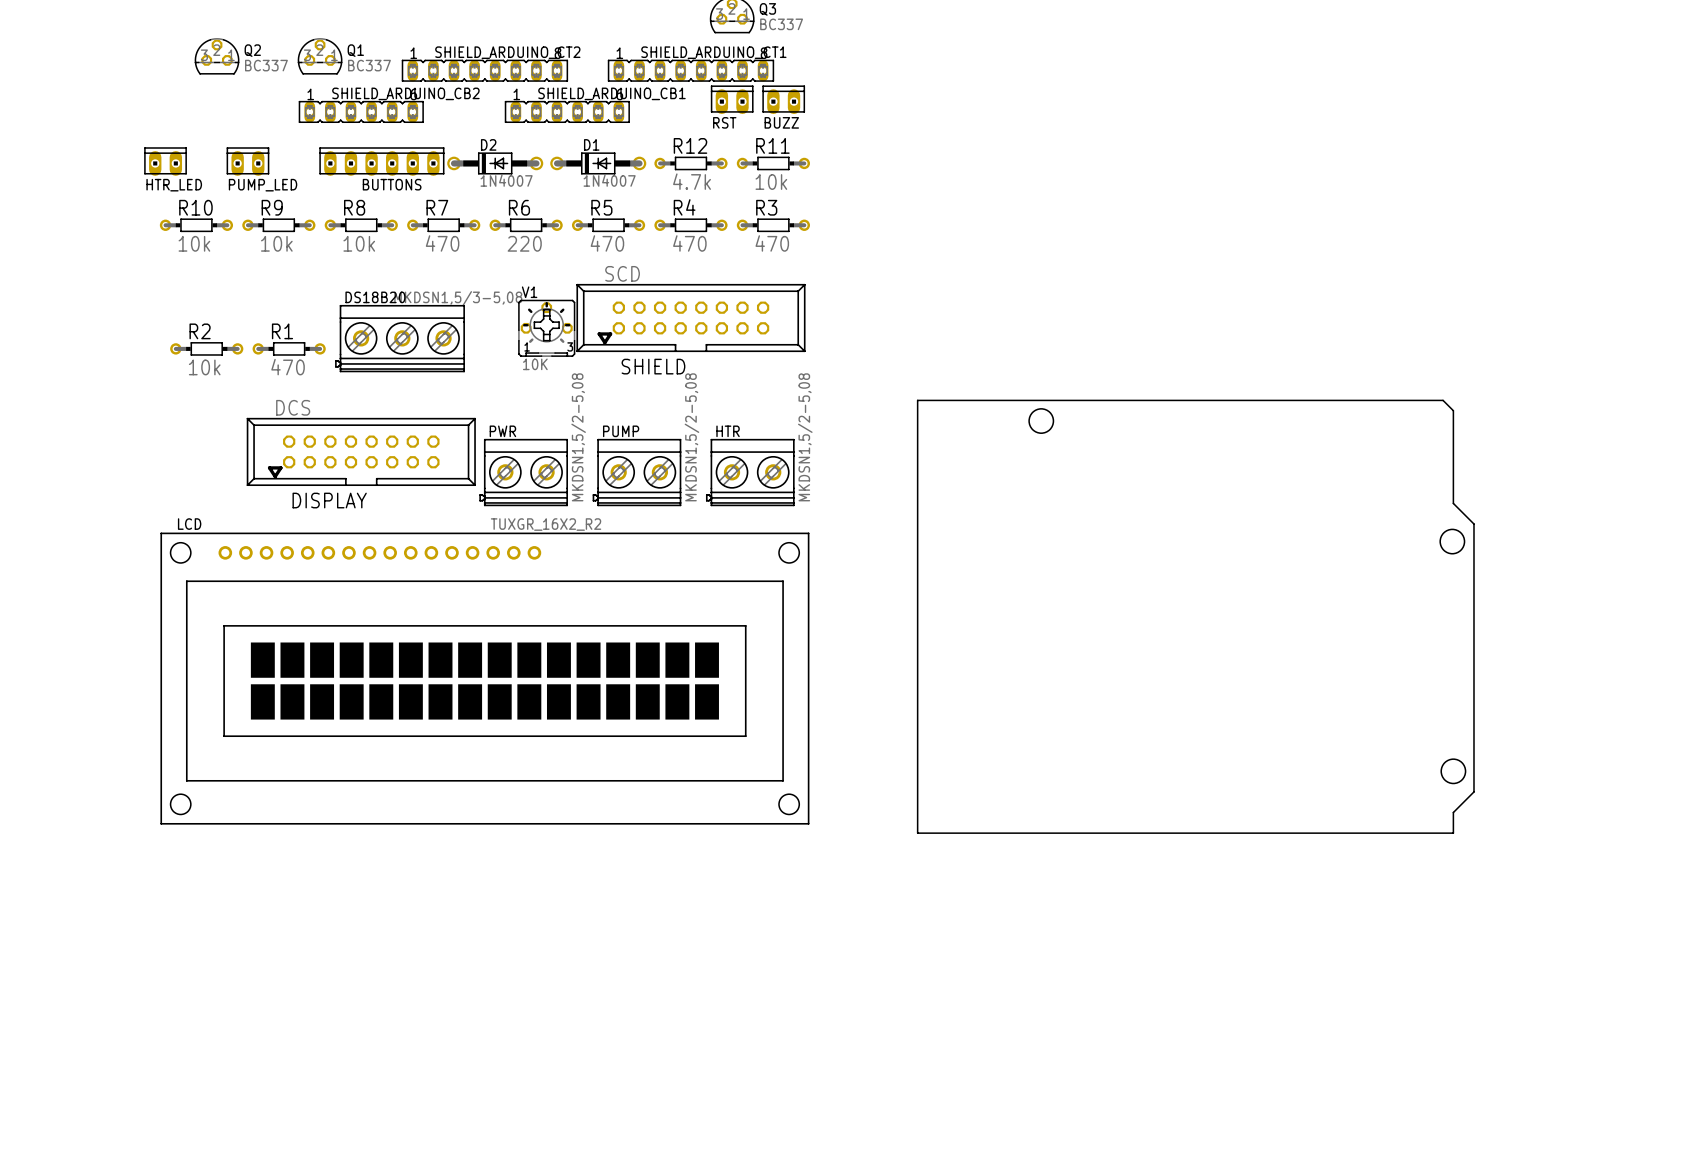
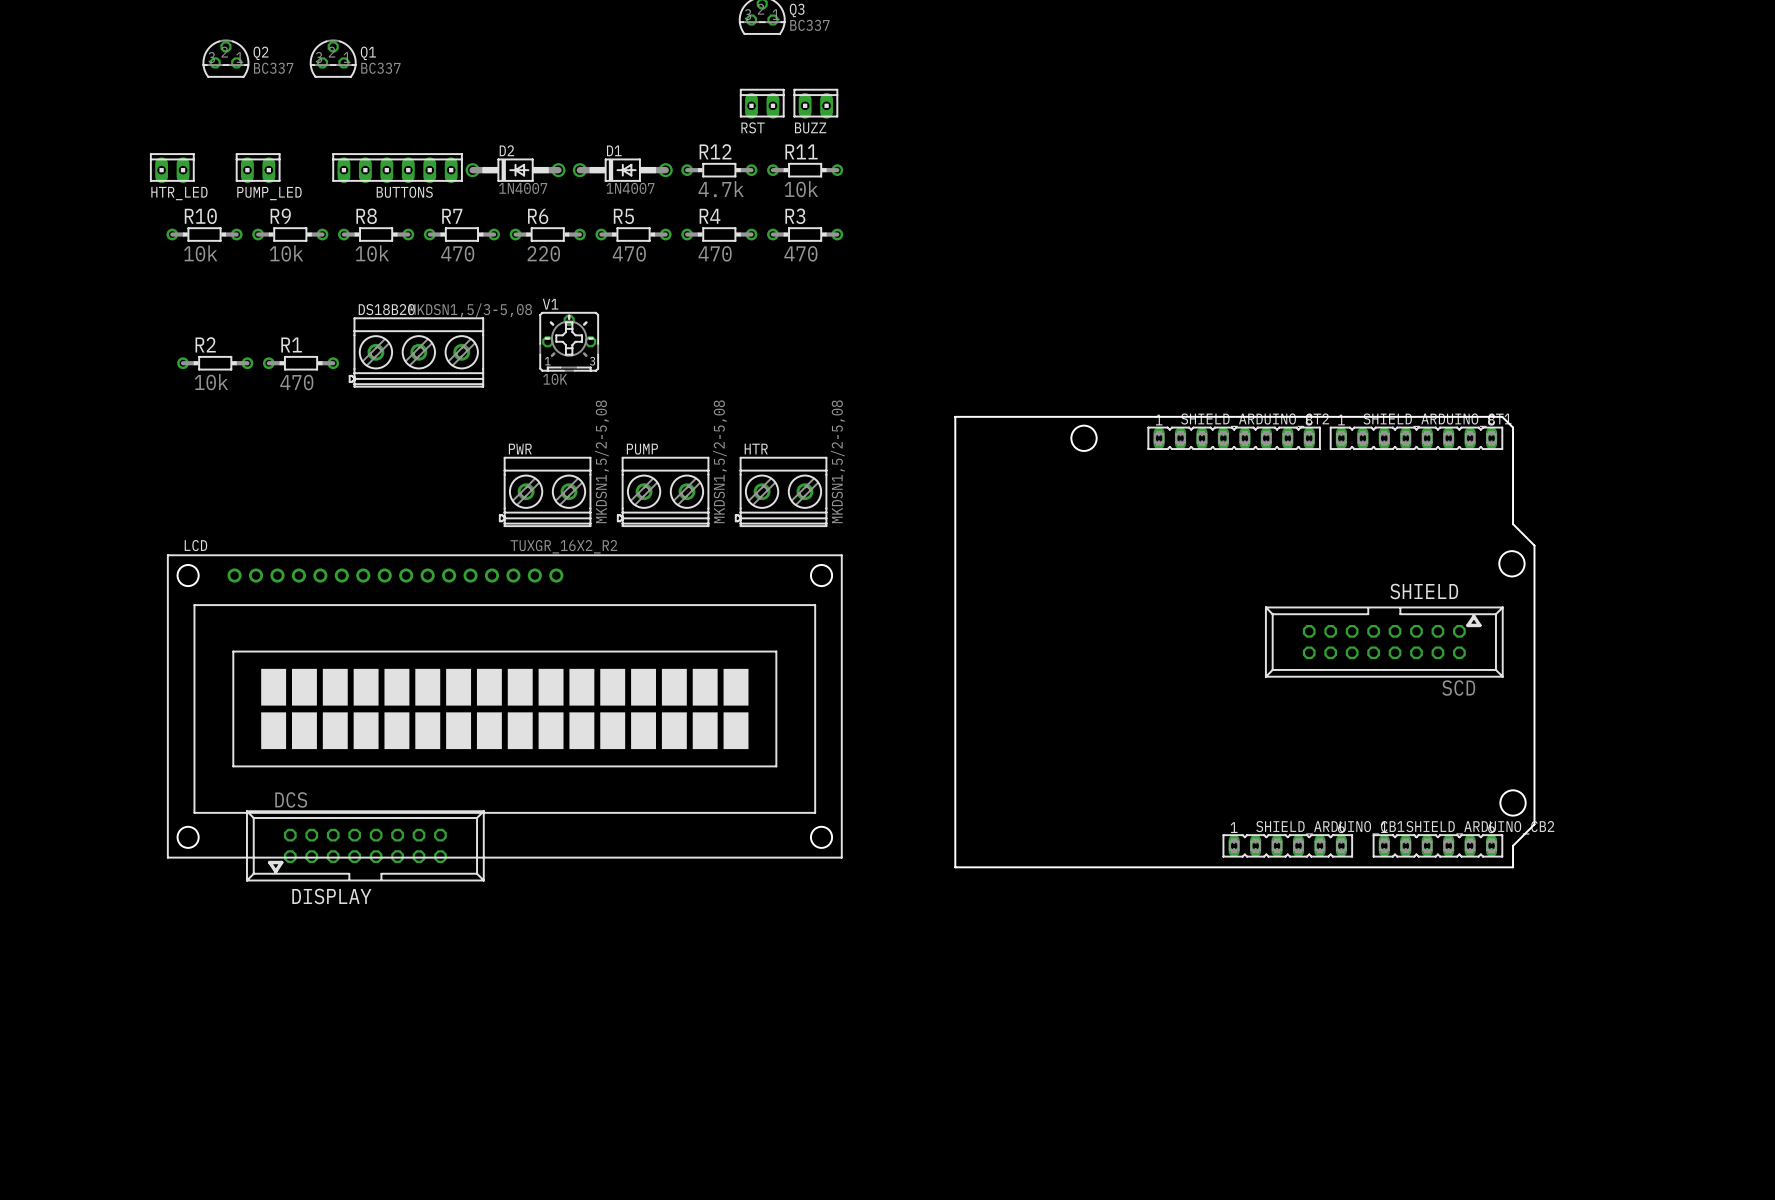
SHIELD_ARDUINO_CT2 position: (484, 70) -> (1234, 438)
SHIELD_ARDUINO_CT1 position: (690, 70) -> (1416, 438)
SHIELD_ARDUINO_CB2 position: (361, 111) -> (1437, 845)
SHIELD_ARDUINO_CB1 position: (567, 111) -> (1287, 845)
SHIELD: SCD (690, 317) -> none
DISPLAY: DCS (361, 451) -> none
SHIELD: none -> SCD (1384, 642)
DISPLAY: none -> DCS (365, 845)

